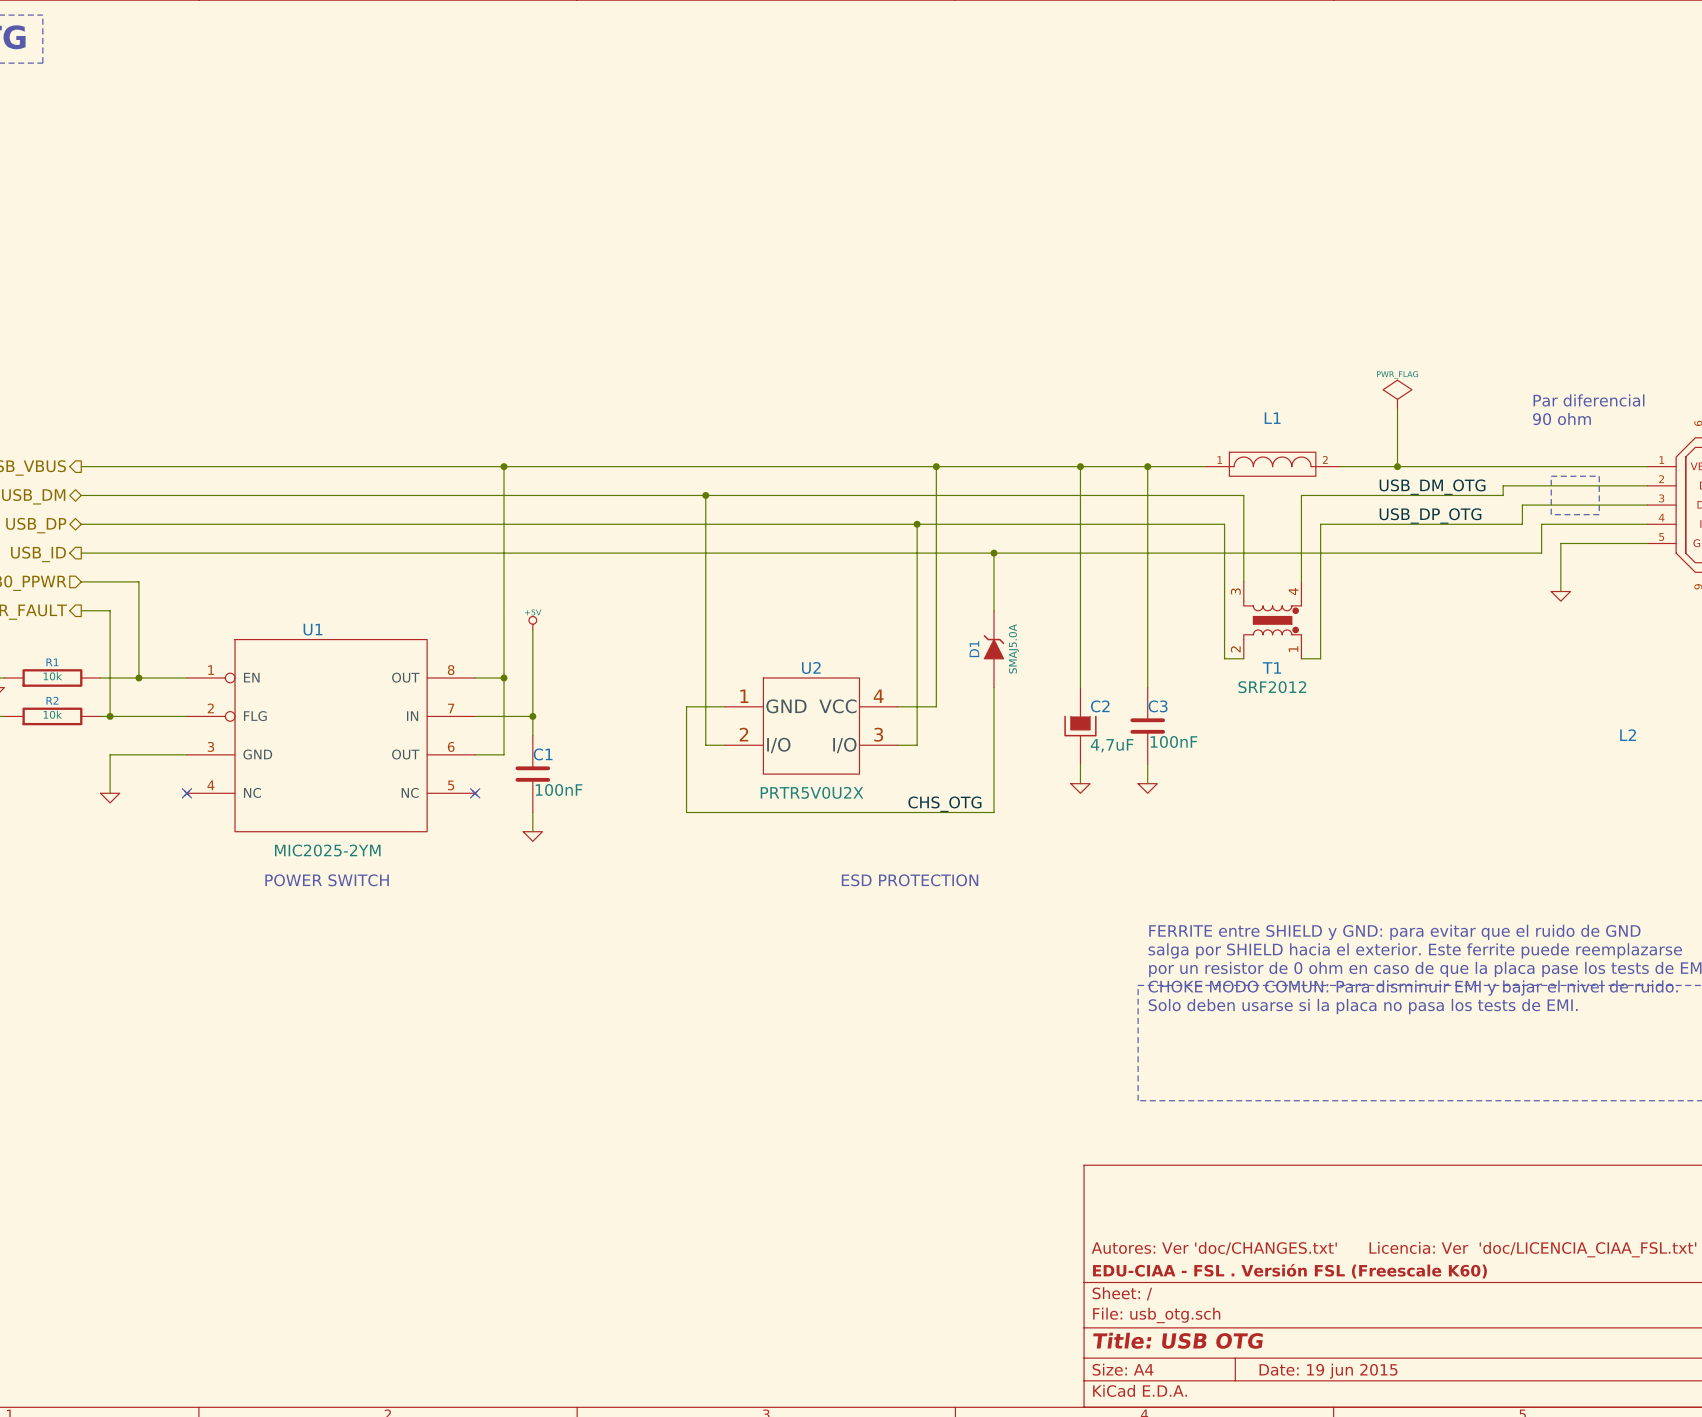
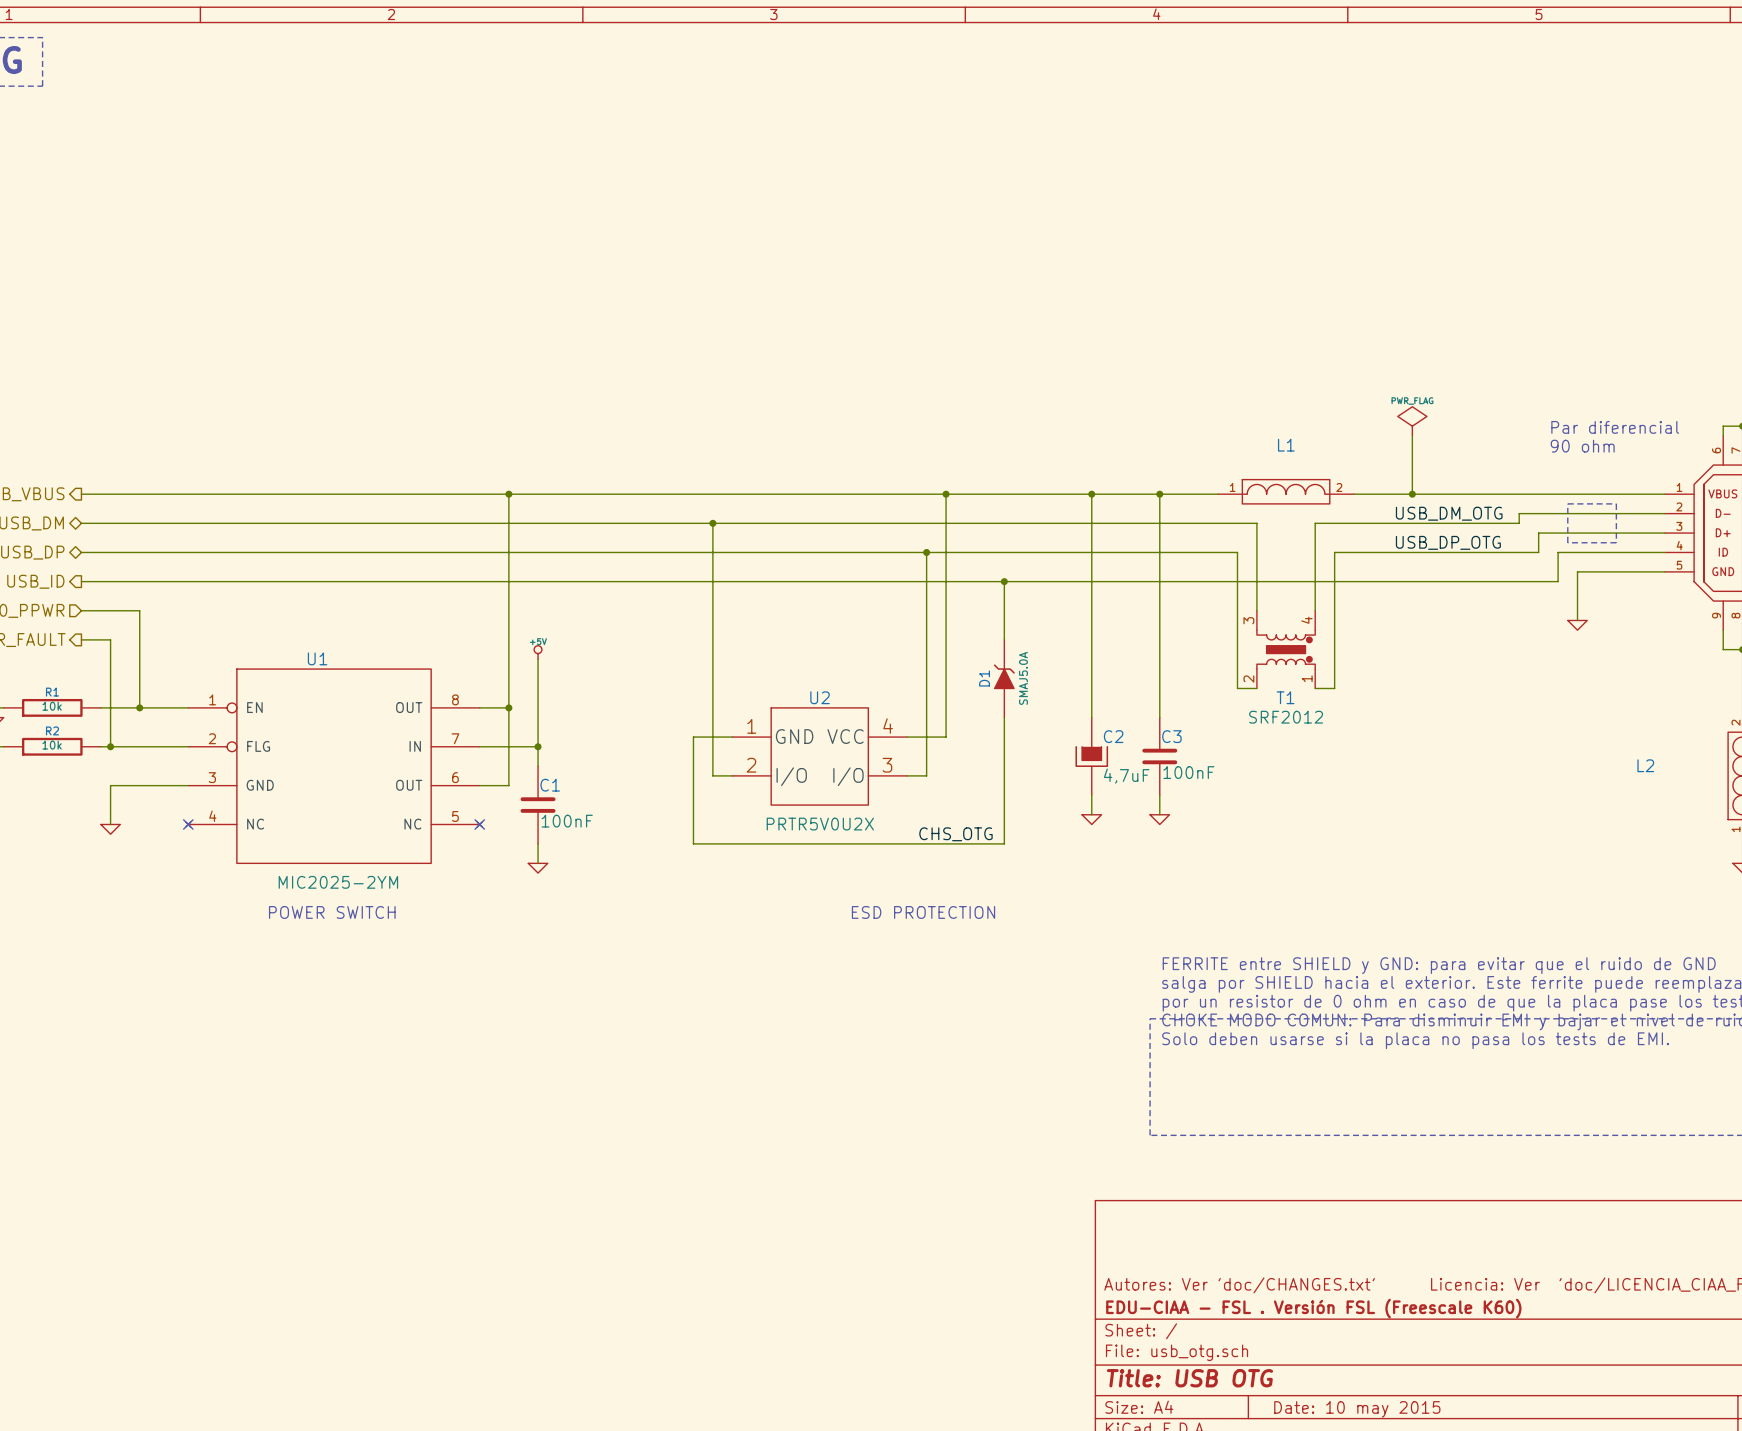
title block: Date: 19 jun 2015 (1328, 1371) -> Date: 10 may 2015 (1357, 1409)

